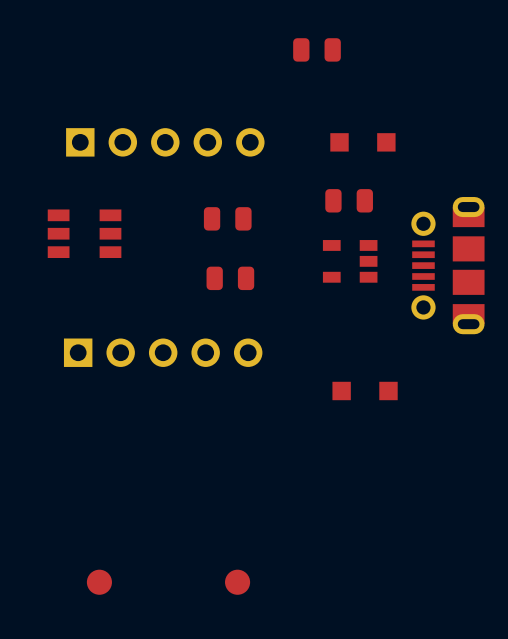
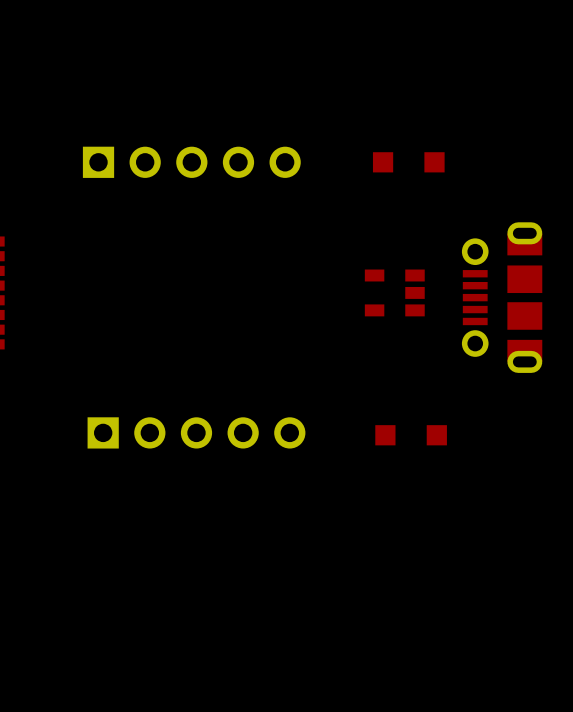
part: (317, 49) -> none
part: (349, 200) -> none
part: (227, 218) -> none
part: (84, 233) -> none
part: (230, 278) -> none
part position: (163, 352) -> (196, 432)
part: (99, 582) -> none
part: (237, 582) -> none

